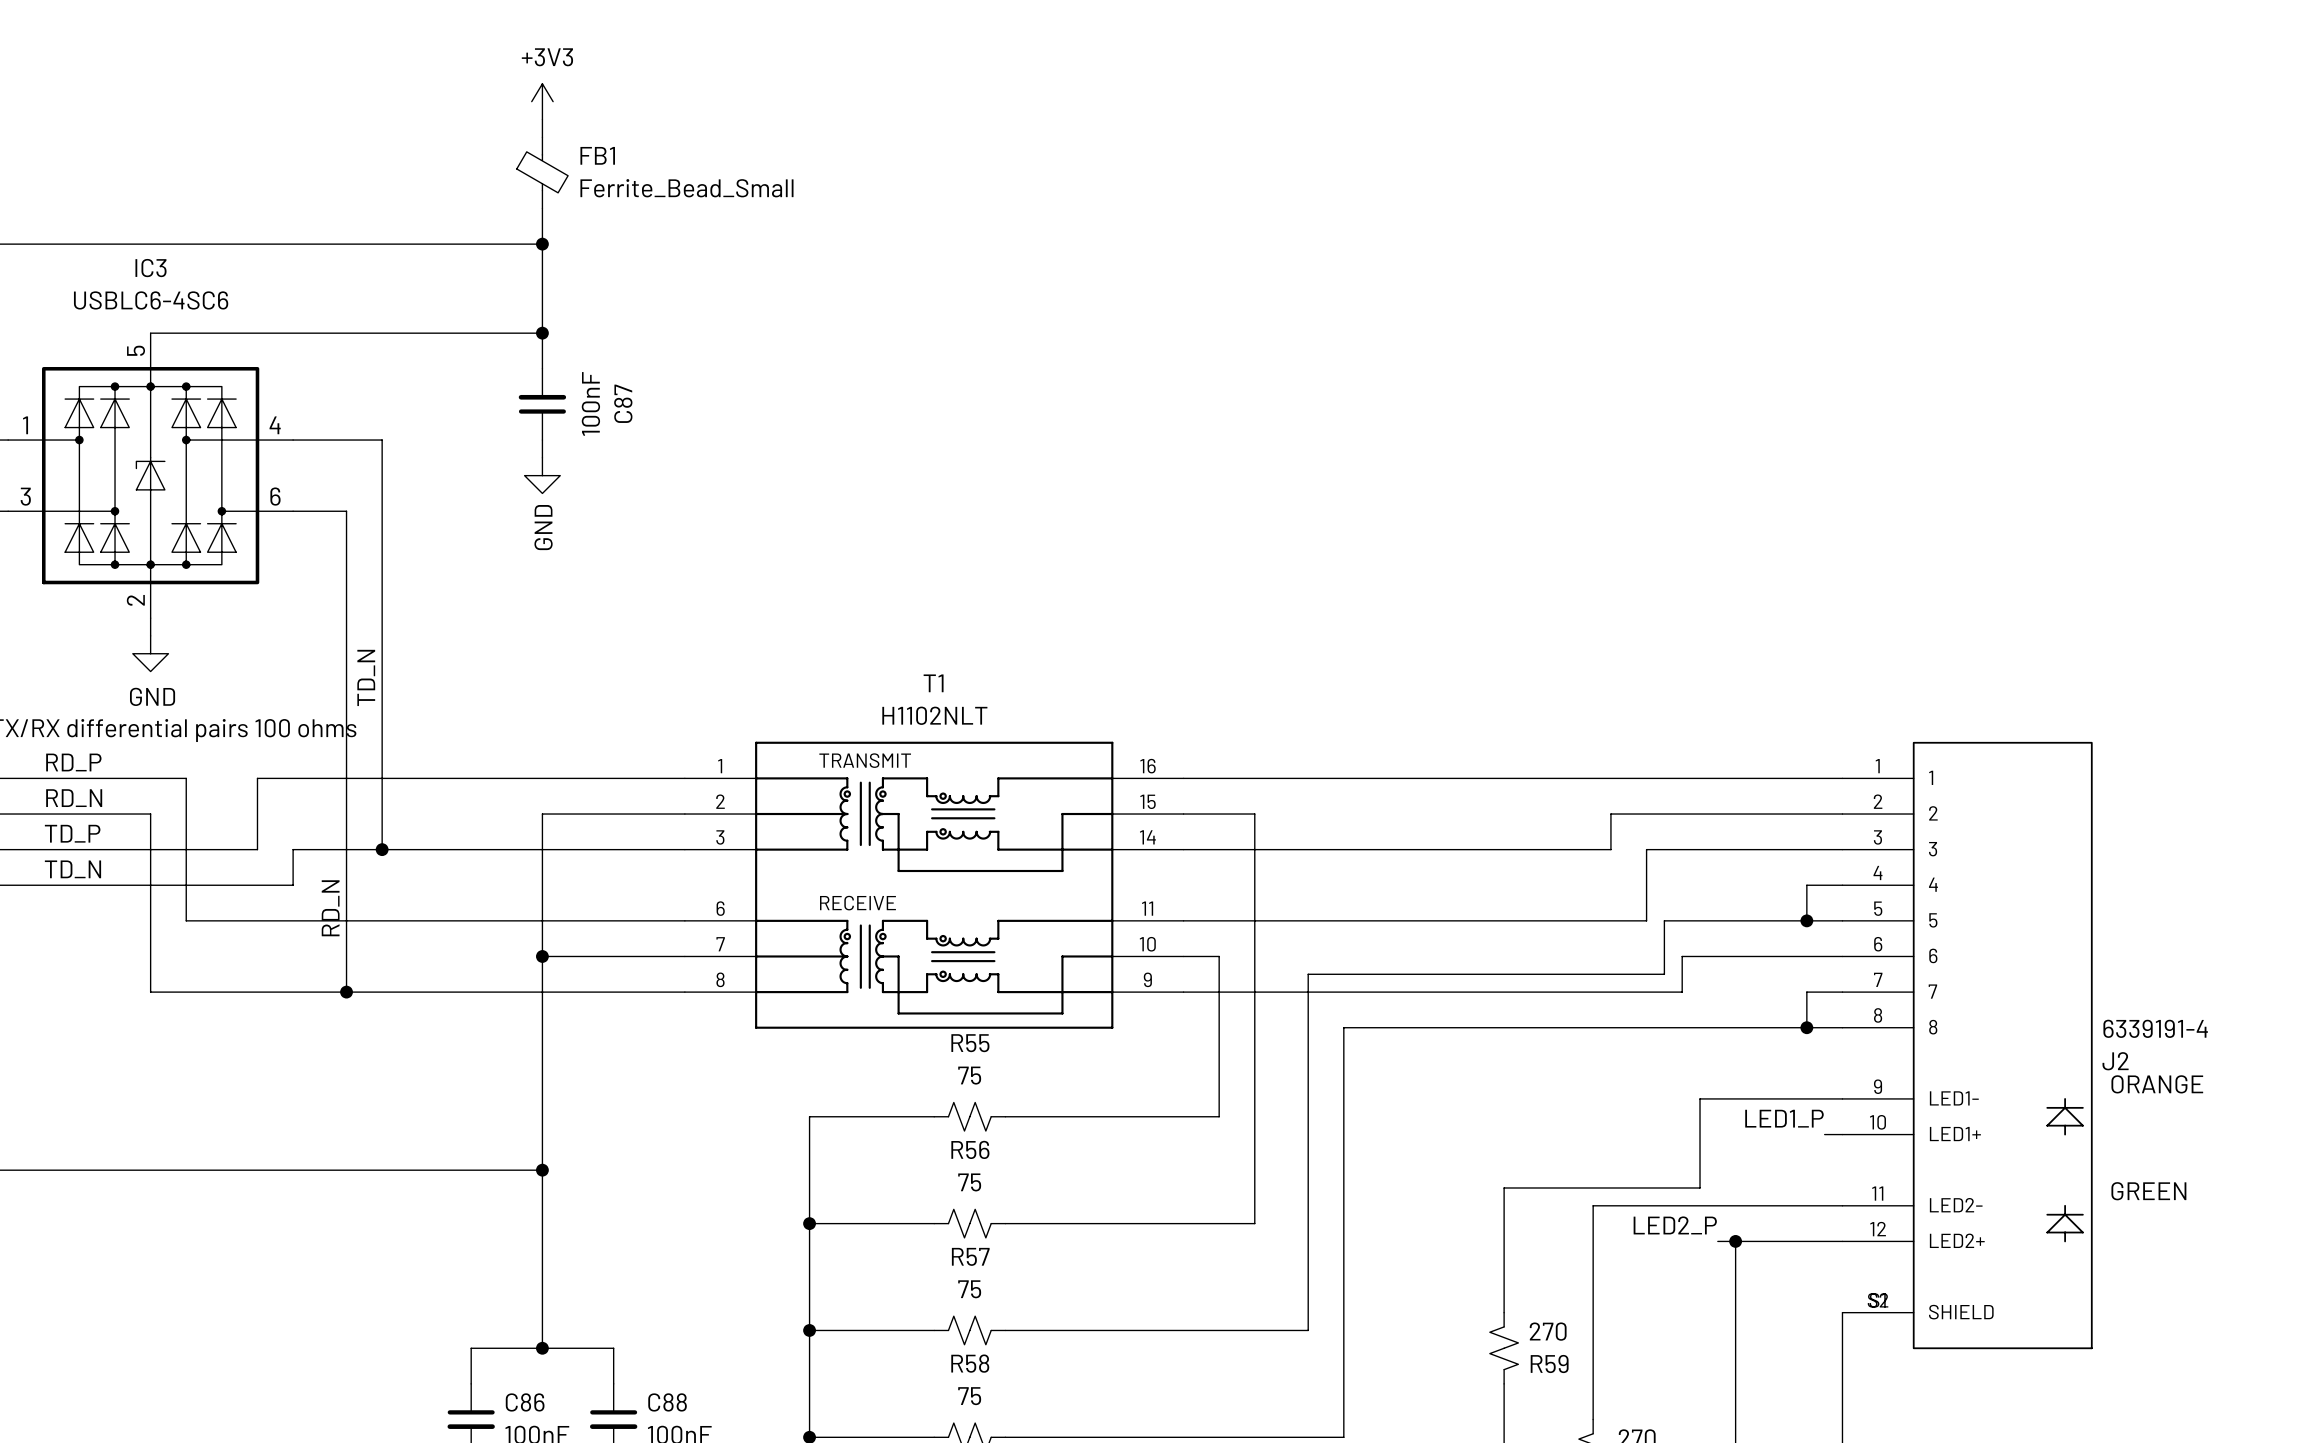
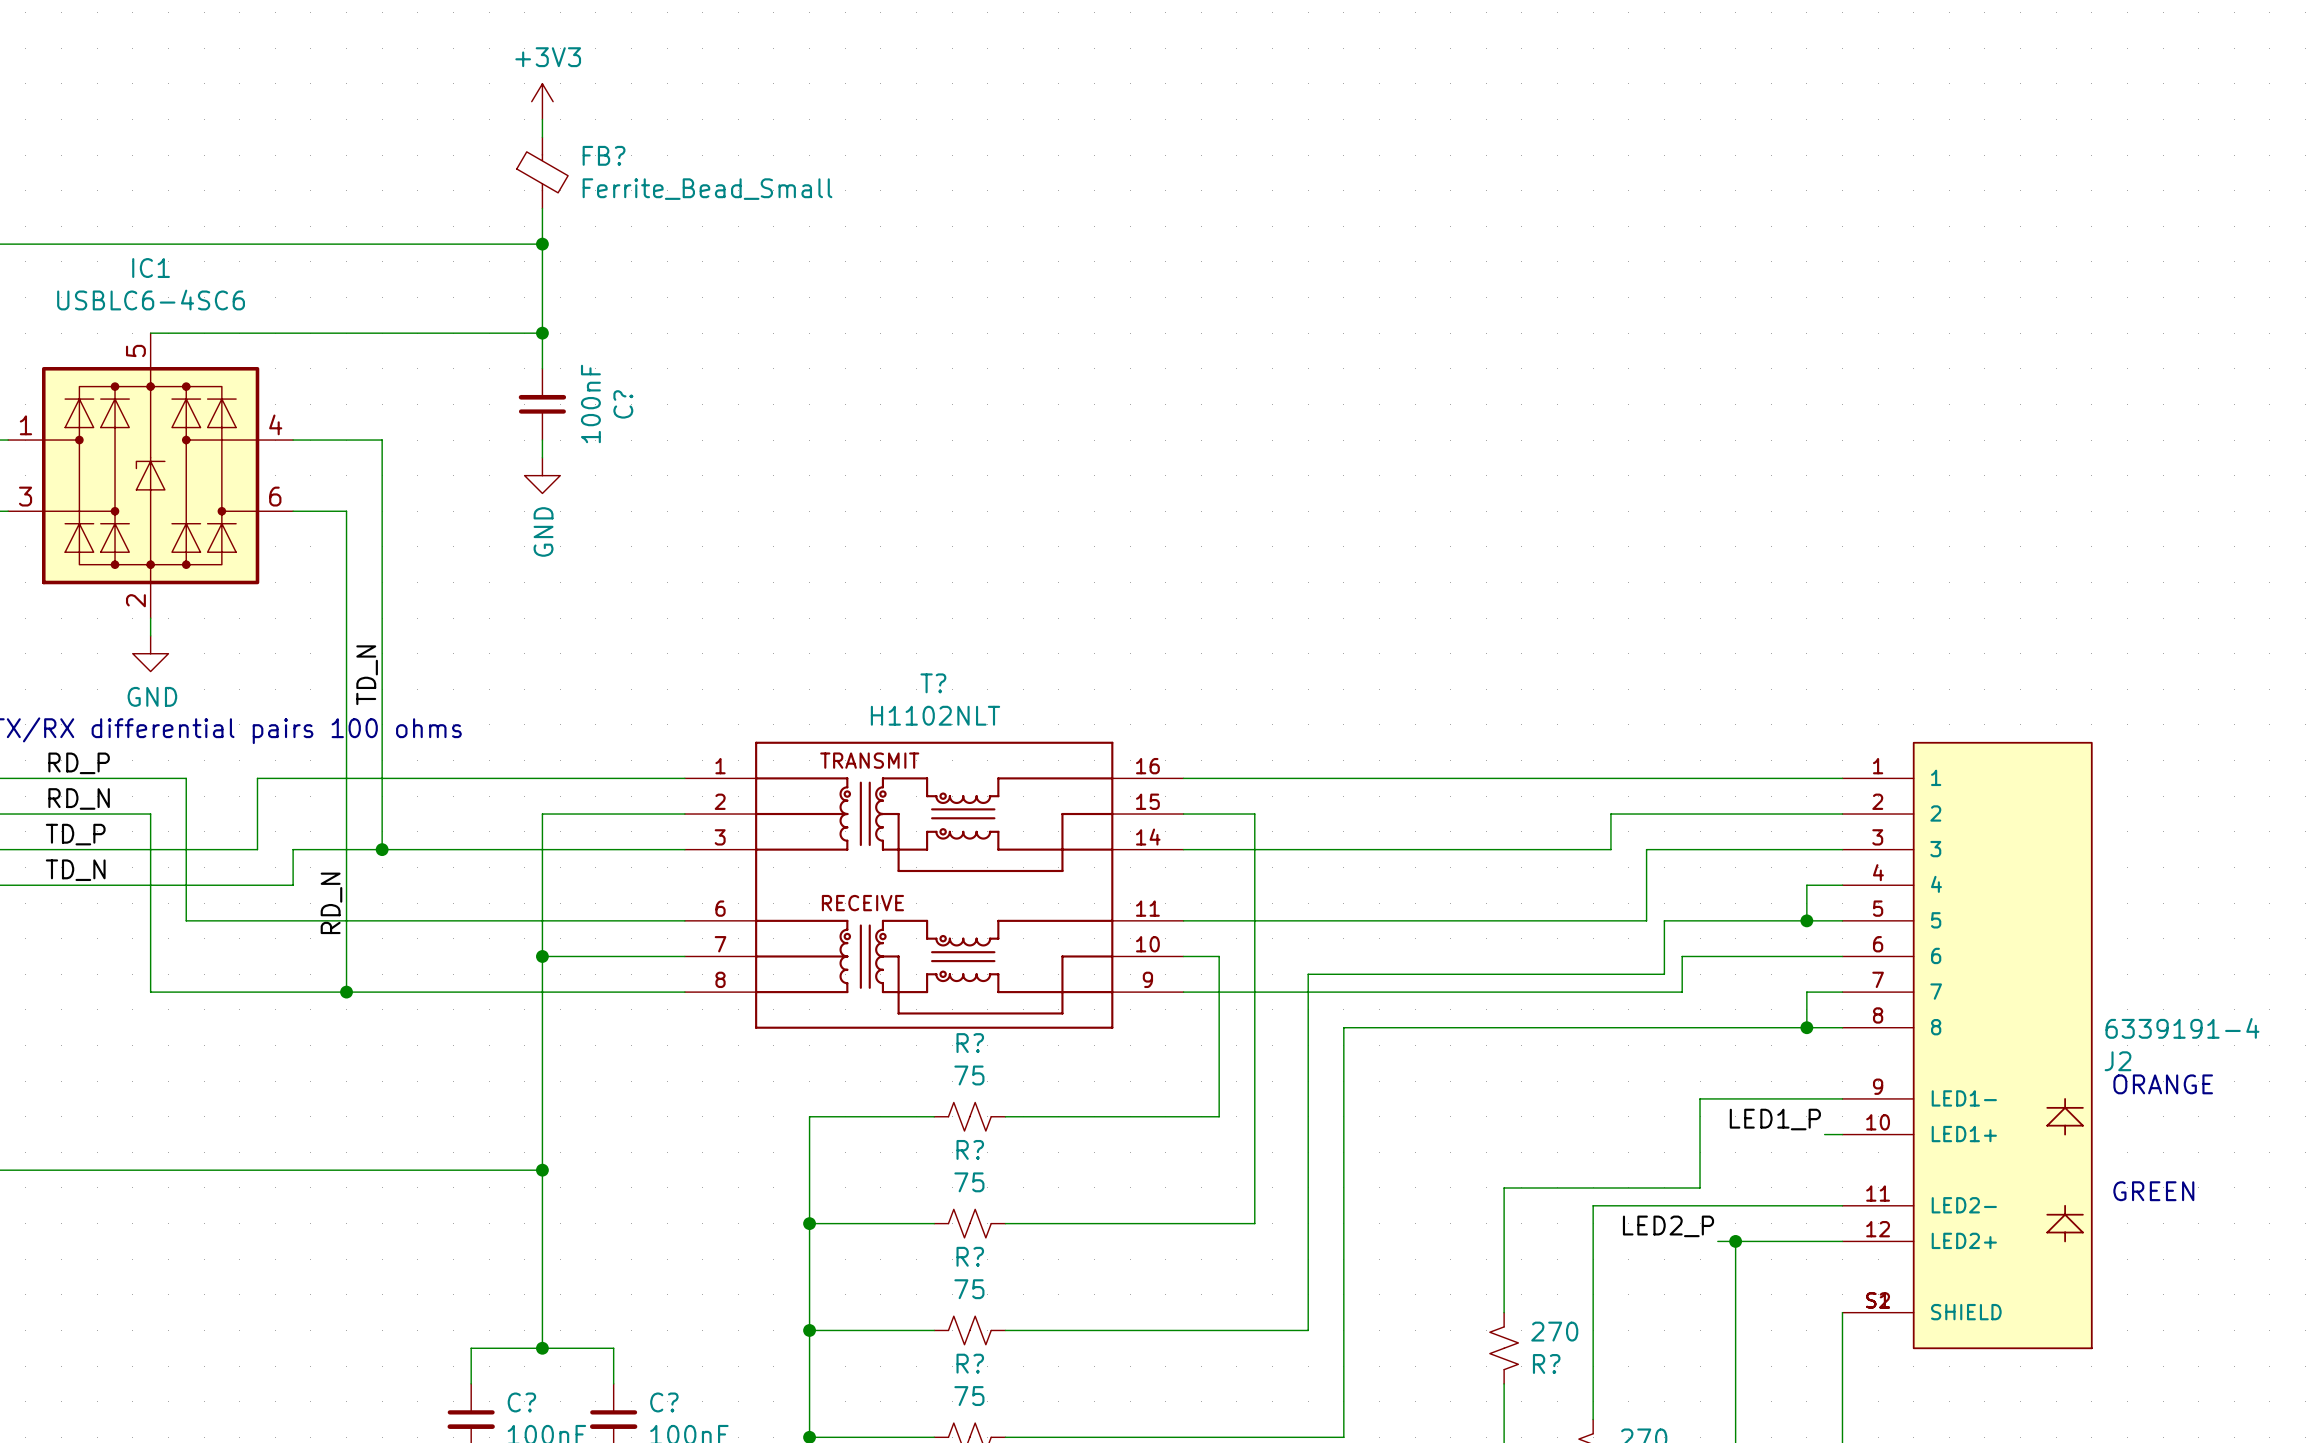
FB1 name: FB1 (597, 155) -> FB? (604, 155)
IC3 name: IC3 (151, 268) -> IC1 (151, 268)
C87 name: C87 (623, 403) -> C? (623, 404)
T1 name: T1 (933, 683) -> T? (933, 683)
R55 name: R55 (970, 1043) -> R? (970, 1043)
R56 name: R56 (970, 1149) -> R? (970, 1149)
R57 name: R57 (970, 1256) -> R? (970, 1256)
R58 name: R58 (970, 1363) -> R? (970, 1363)
R59 name: R59 (1549, 1364) -> R? (1546, 1363)
C86 name: C86 (525, 1402) -> C? (521, 1402)
C88 name: C88 (667, 1402) -> C? (664, 1402)

